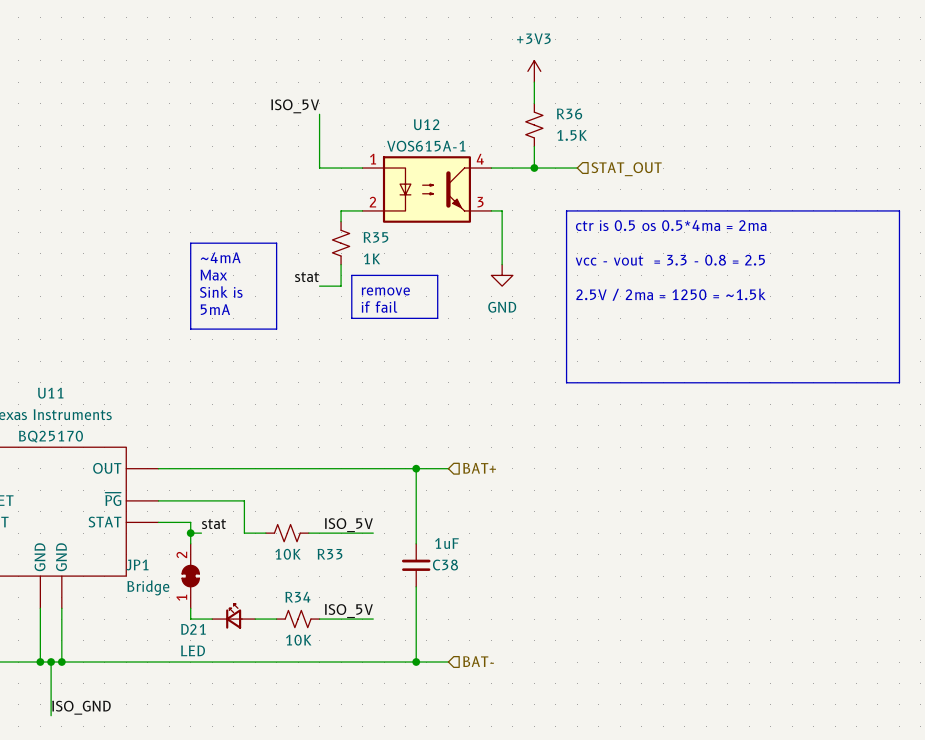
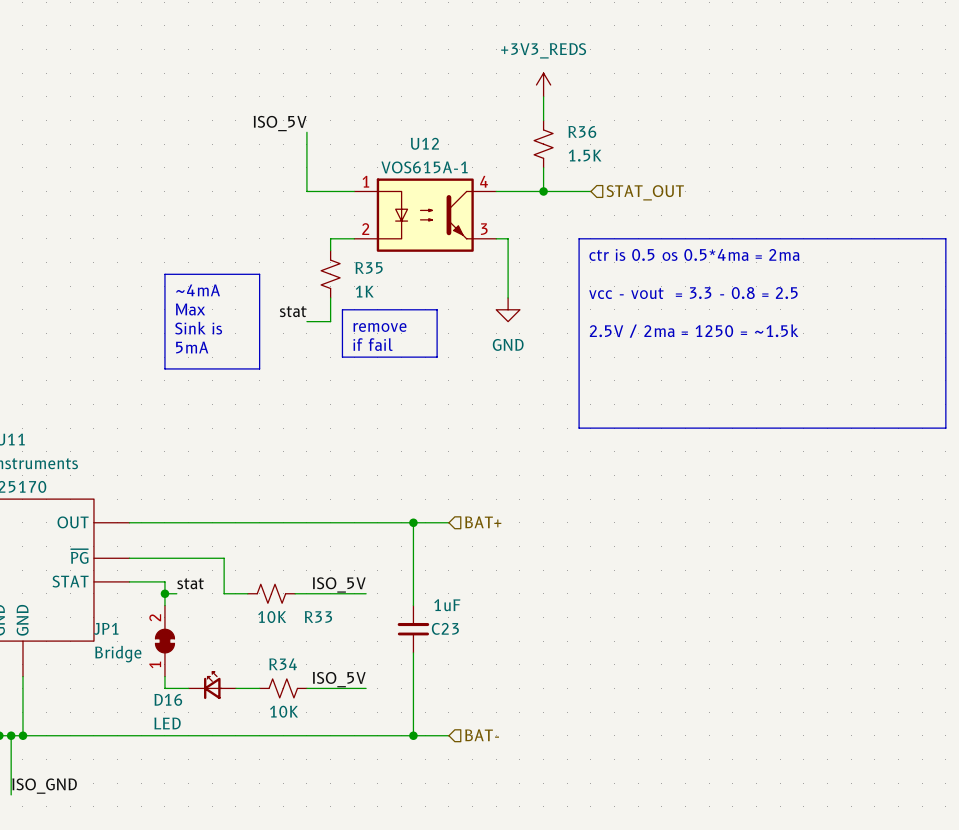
power symbol: +3V3 (534, 71) -> +3V3_REDS (543, 85)
C38 name: C38 (445, 565) -> C23 (445, 628)
D21 name: D21 (193, 629) -> D16 (168, 699)

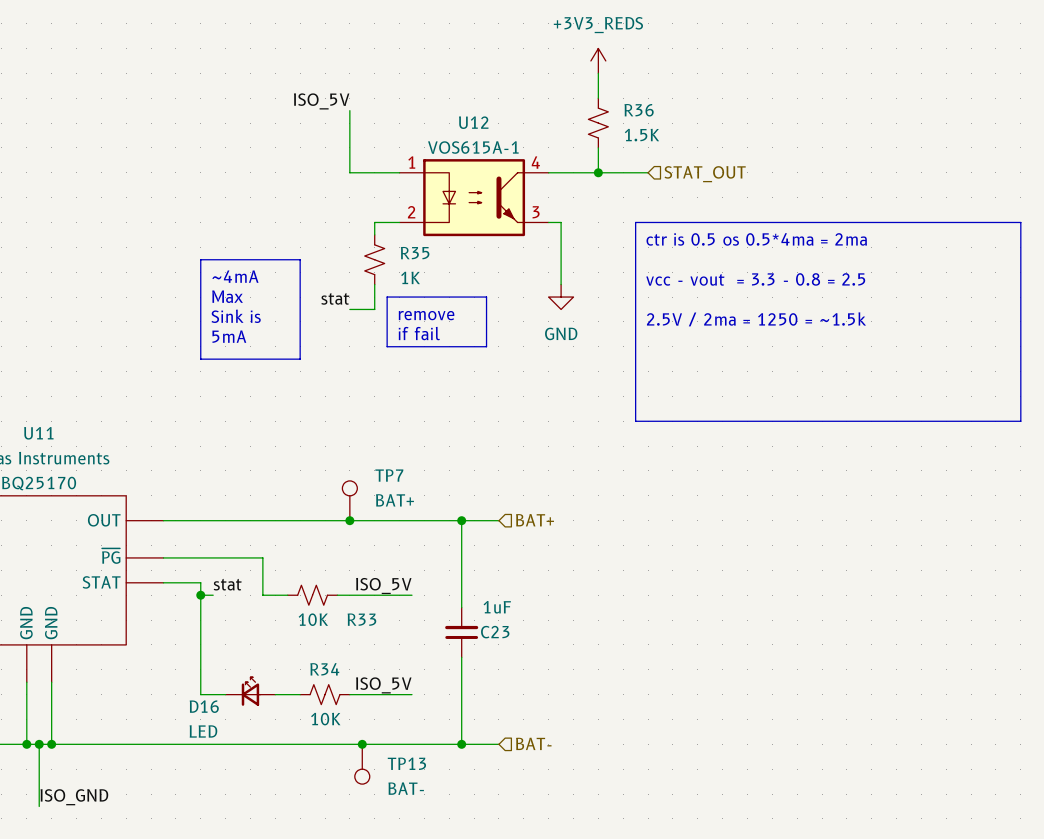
TP7: none -> BAT+ (349, 500)
junction: none -> (349, 520)
JP1: Bridge (164, 641) -> none
junction: none -> (362, 744)
TP13: none -> BAT- (362, 764)

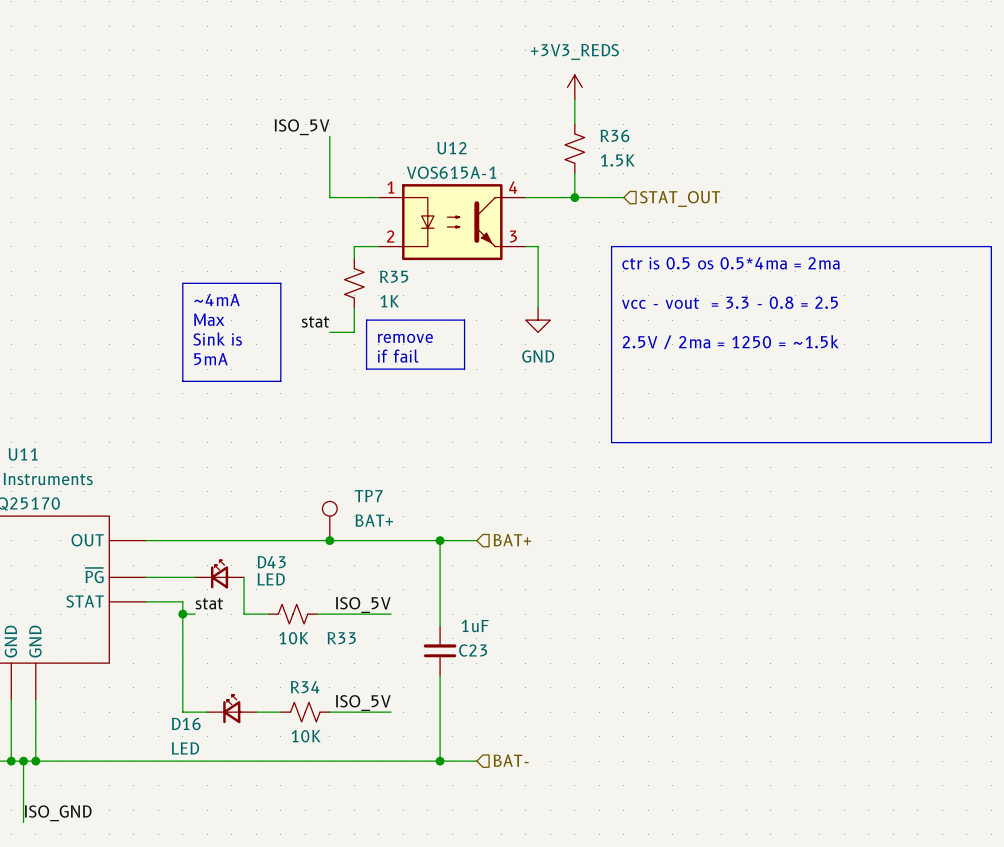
D43: none -> LED (219, 574)
junction: (362, 744) -> none
TP13: BAT- (362, 764) -> none

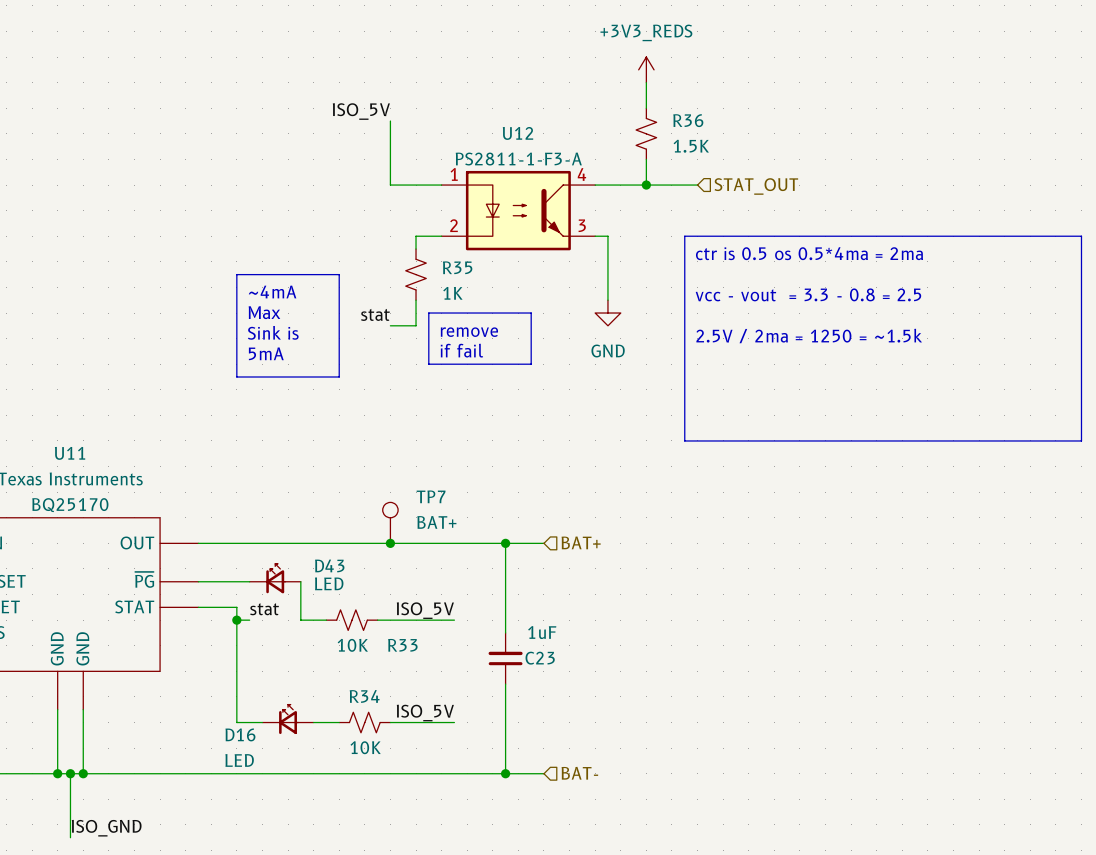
U12 value: VOS615A-1 (451, 172) -> PS2811-1-F3-A (518, 159)

